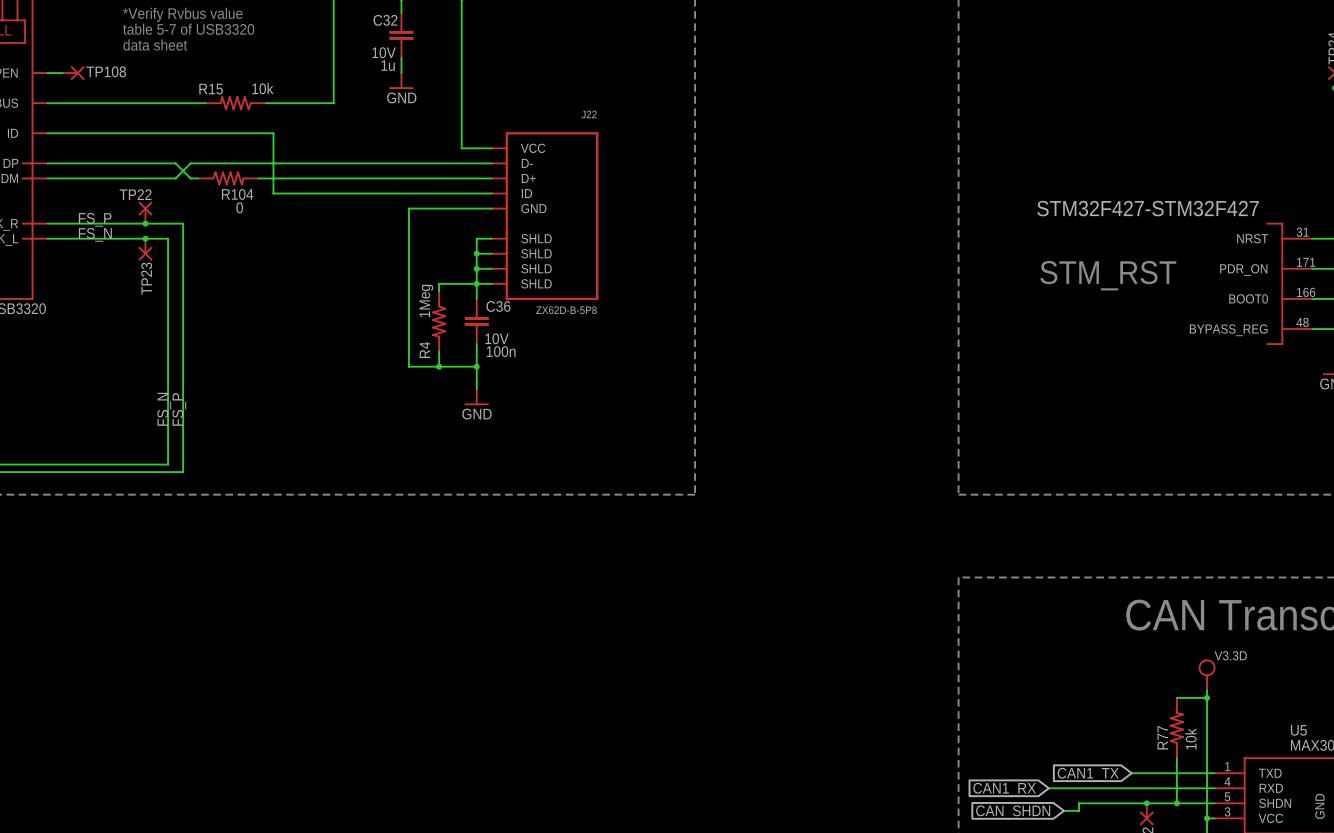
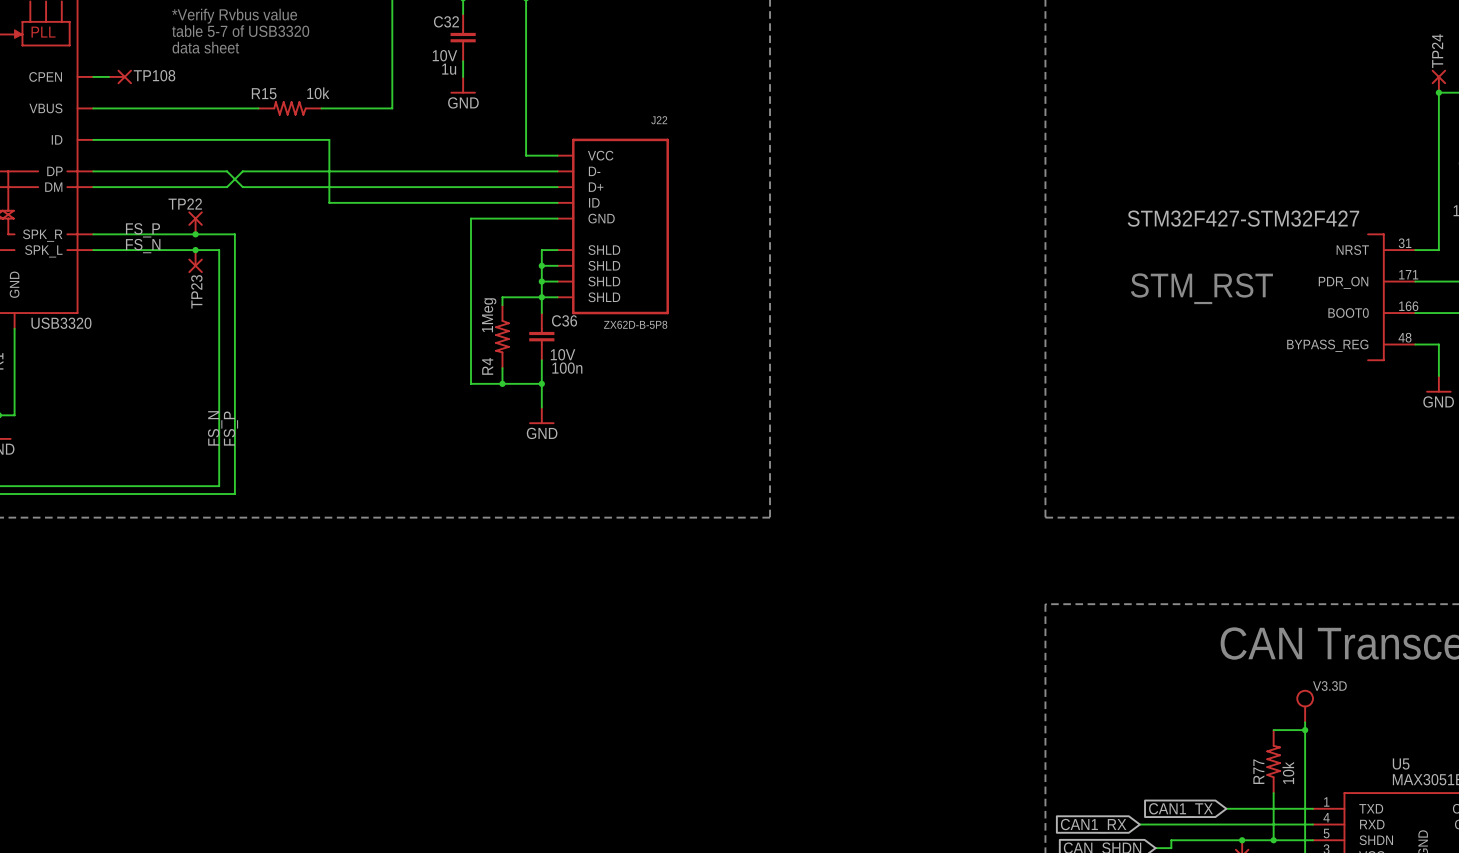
R104: 0 (228, 178) -> none

